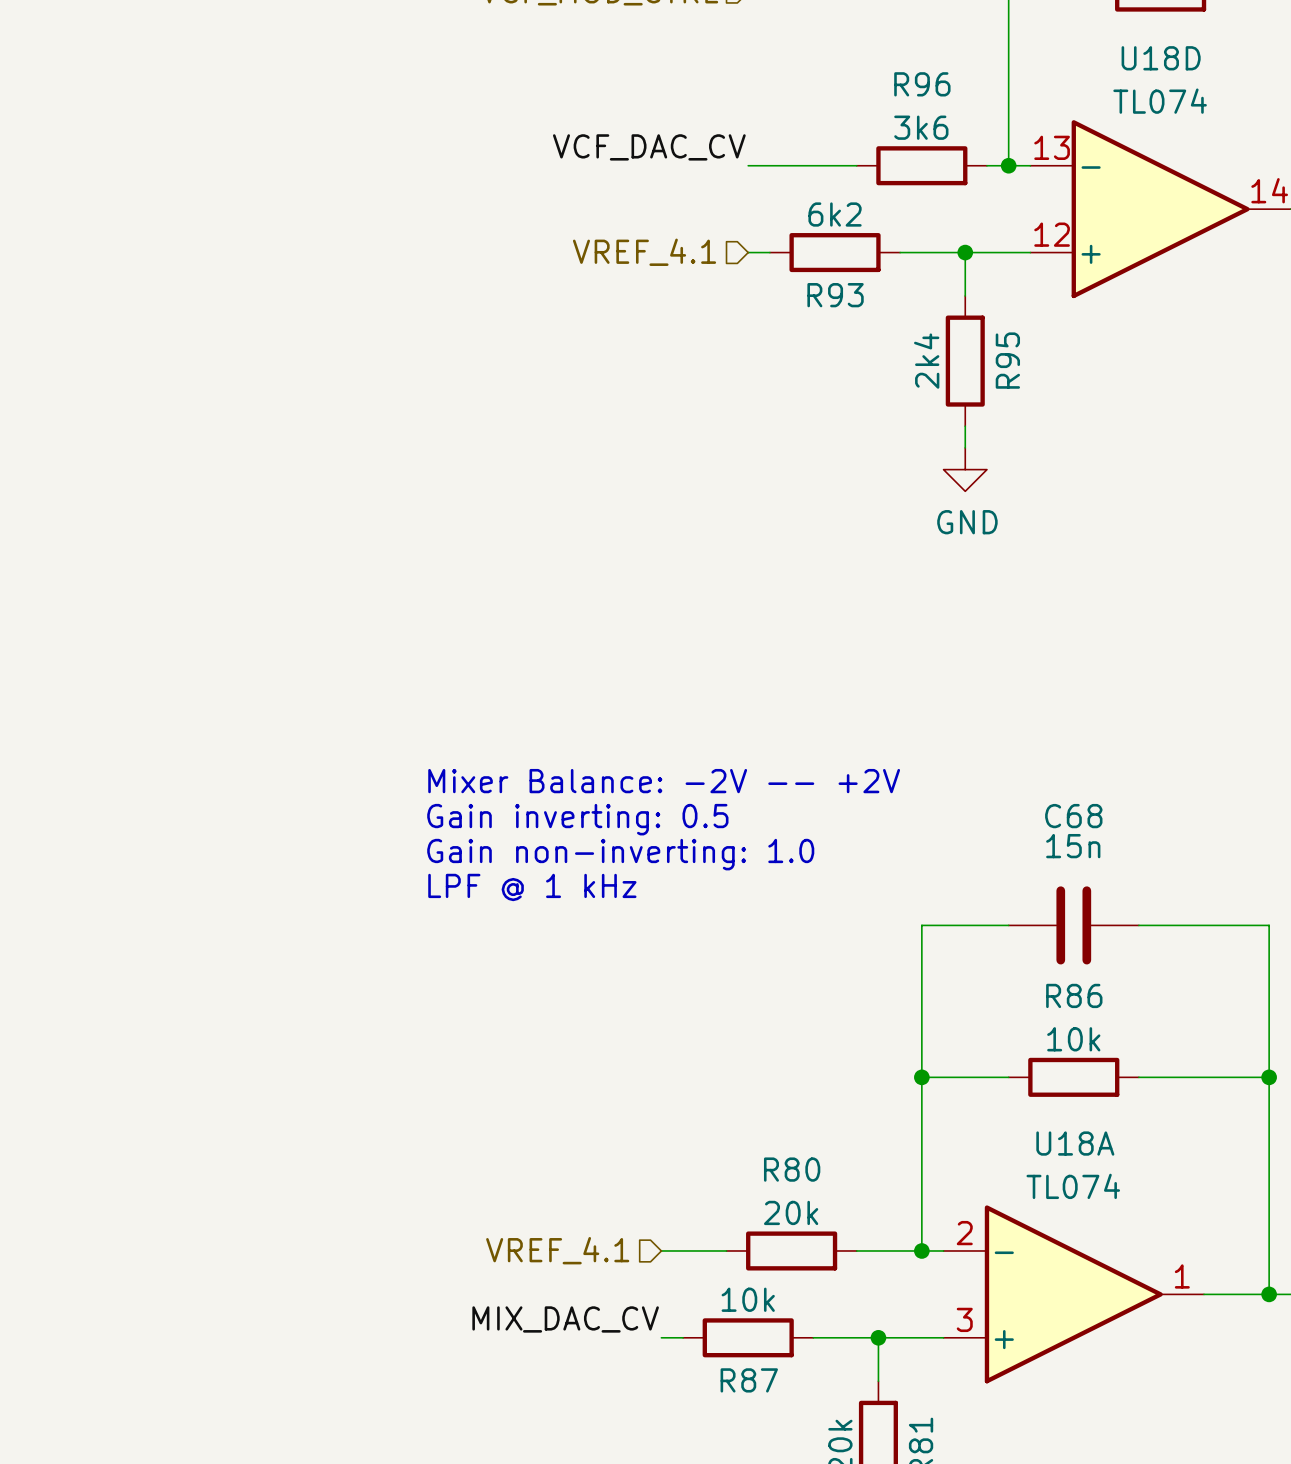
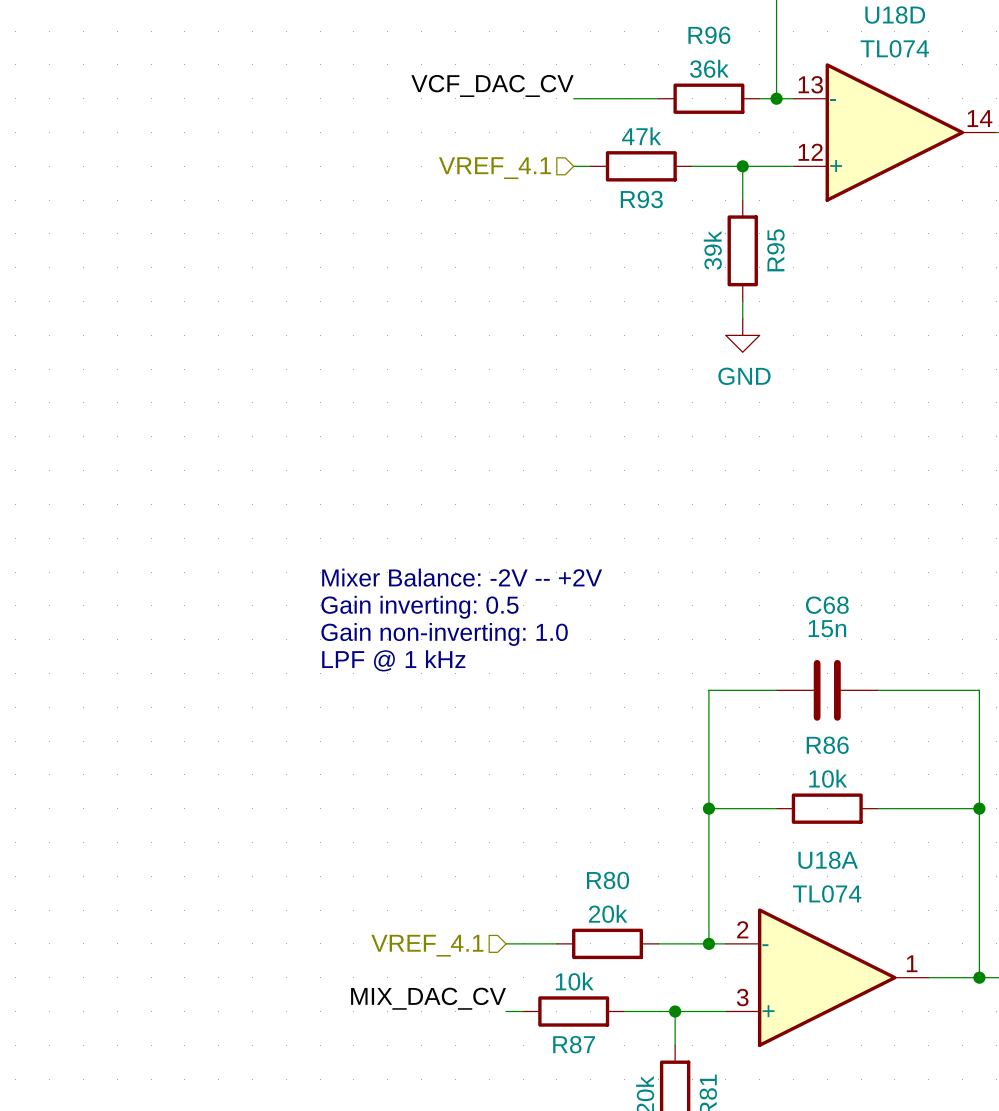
R96 value: 3k6 (921, 127) -> 36k (709, 68)
R93 value: 6k2 (835, 214) -> 47k (641, 136)
R95 value: 2k4 (926, 361) -> 39k (712, 250)

